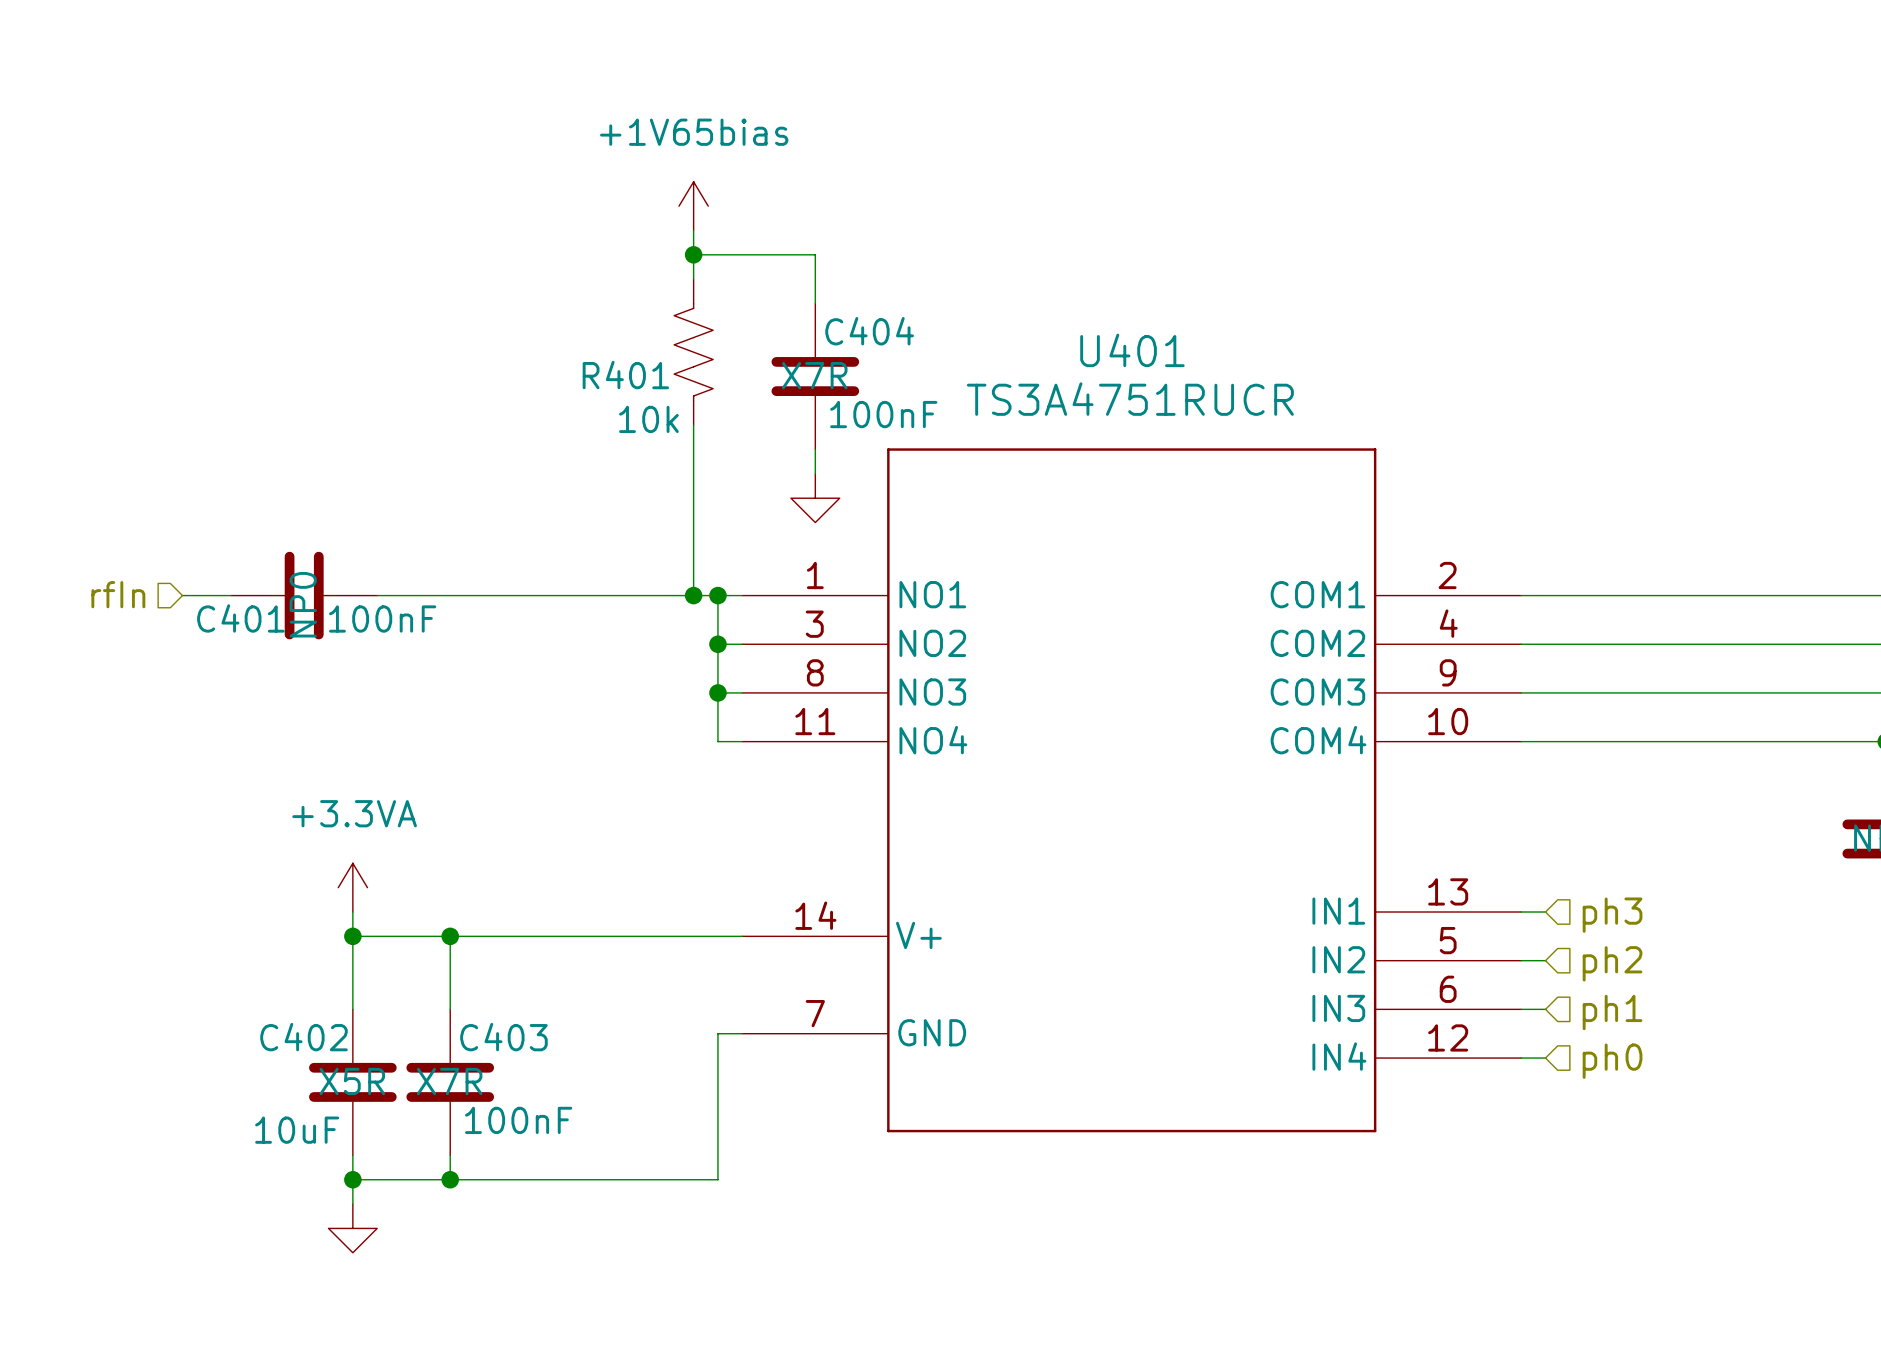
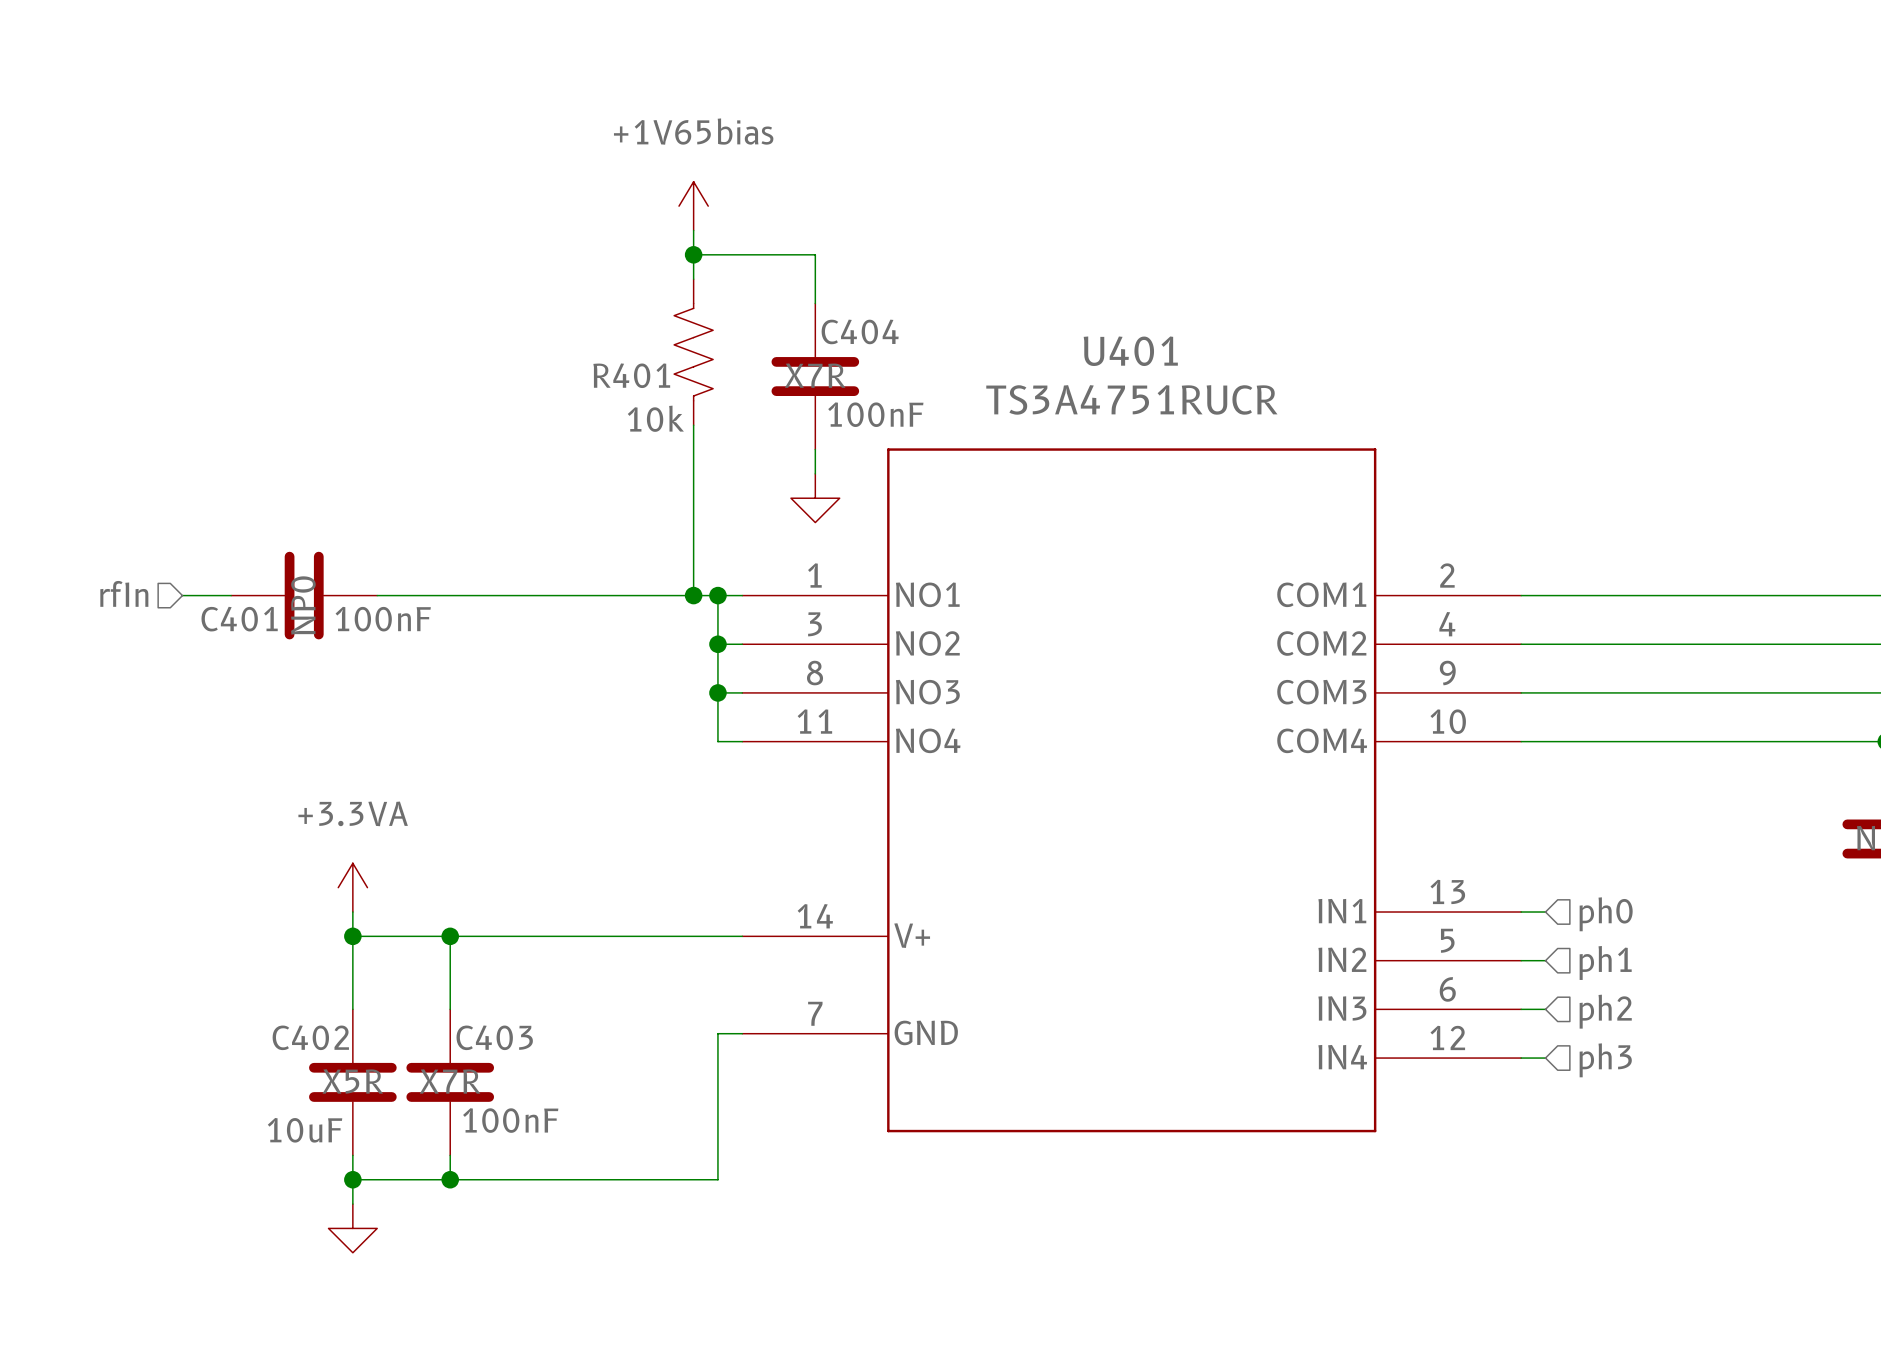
hierarchical label: ph3 (1612, 915) -> ph0 (1606, 914)
hierarchical label: ph2 (1612, 963) -> ph1 (1605, 962)
hierarchical label: ph1 (1612, 1012) -> ph2 (1605, 1011)
hierarchical label: ph0 (1612, 1061) -> ph3 (1605, 1060)

